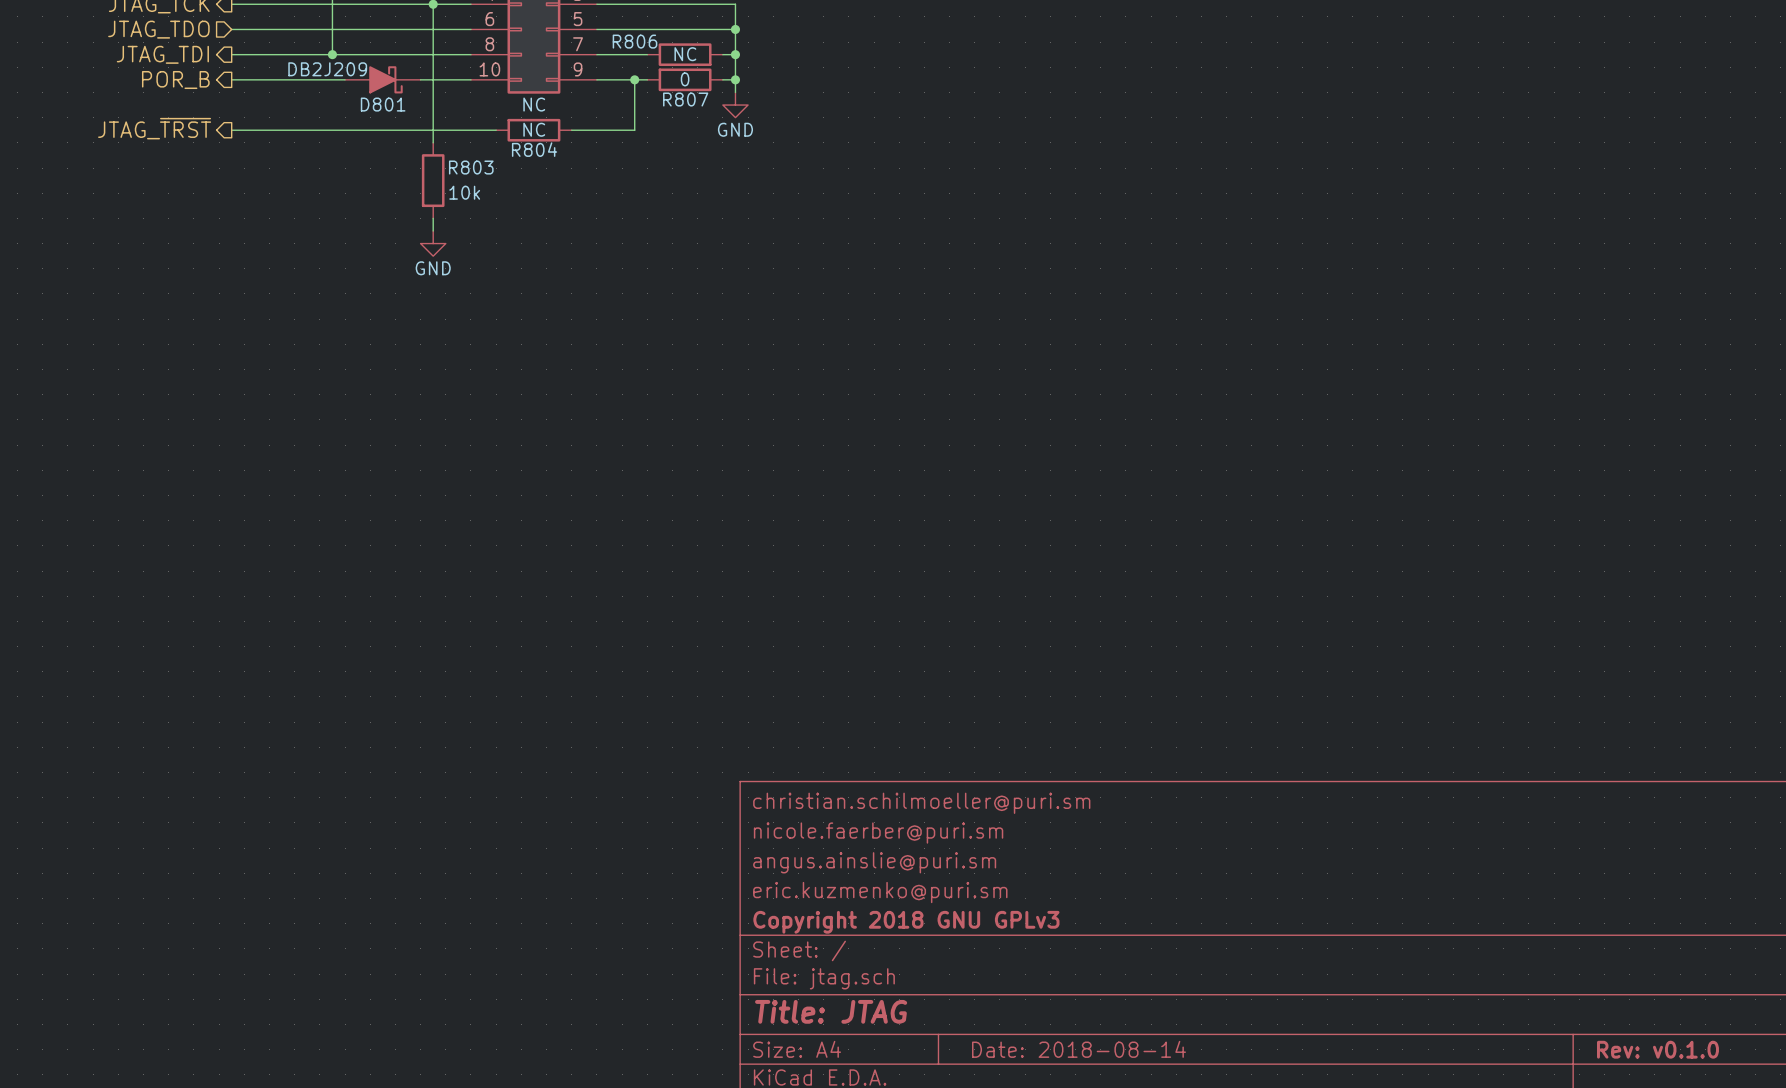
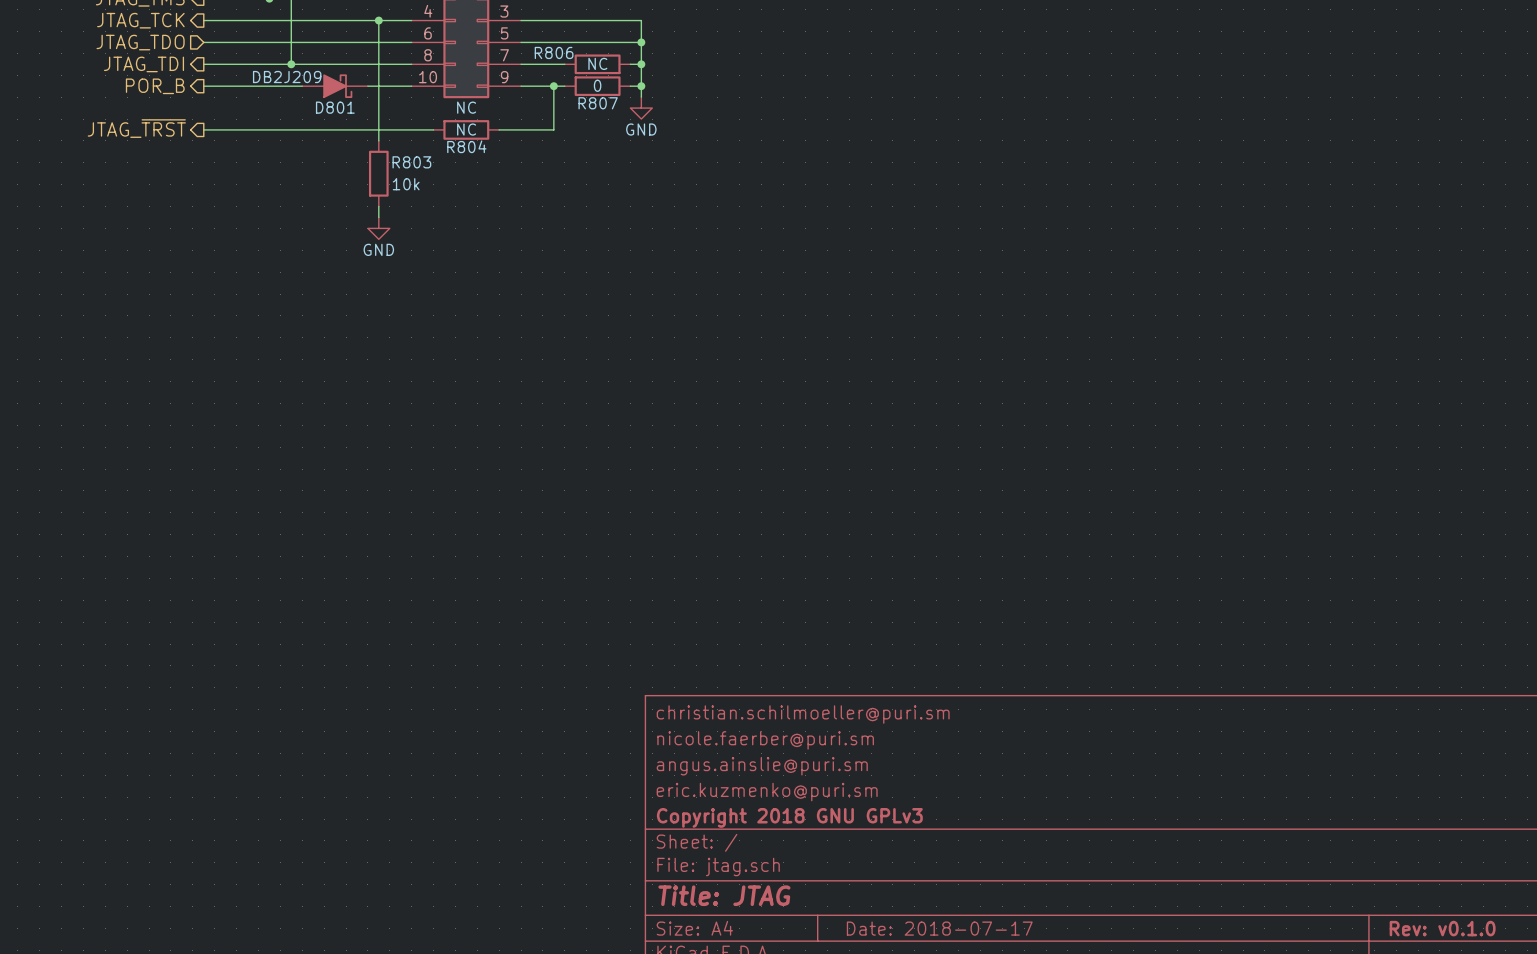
title block: Date: 2018-08-14 (1079, 1049) -> Date: 2018-07-17 (939, 928)

